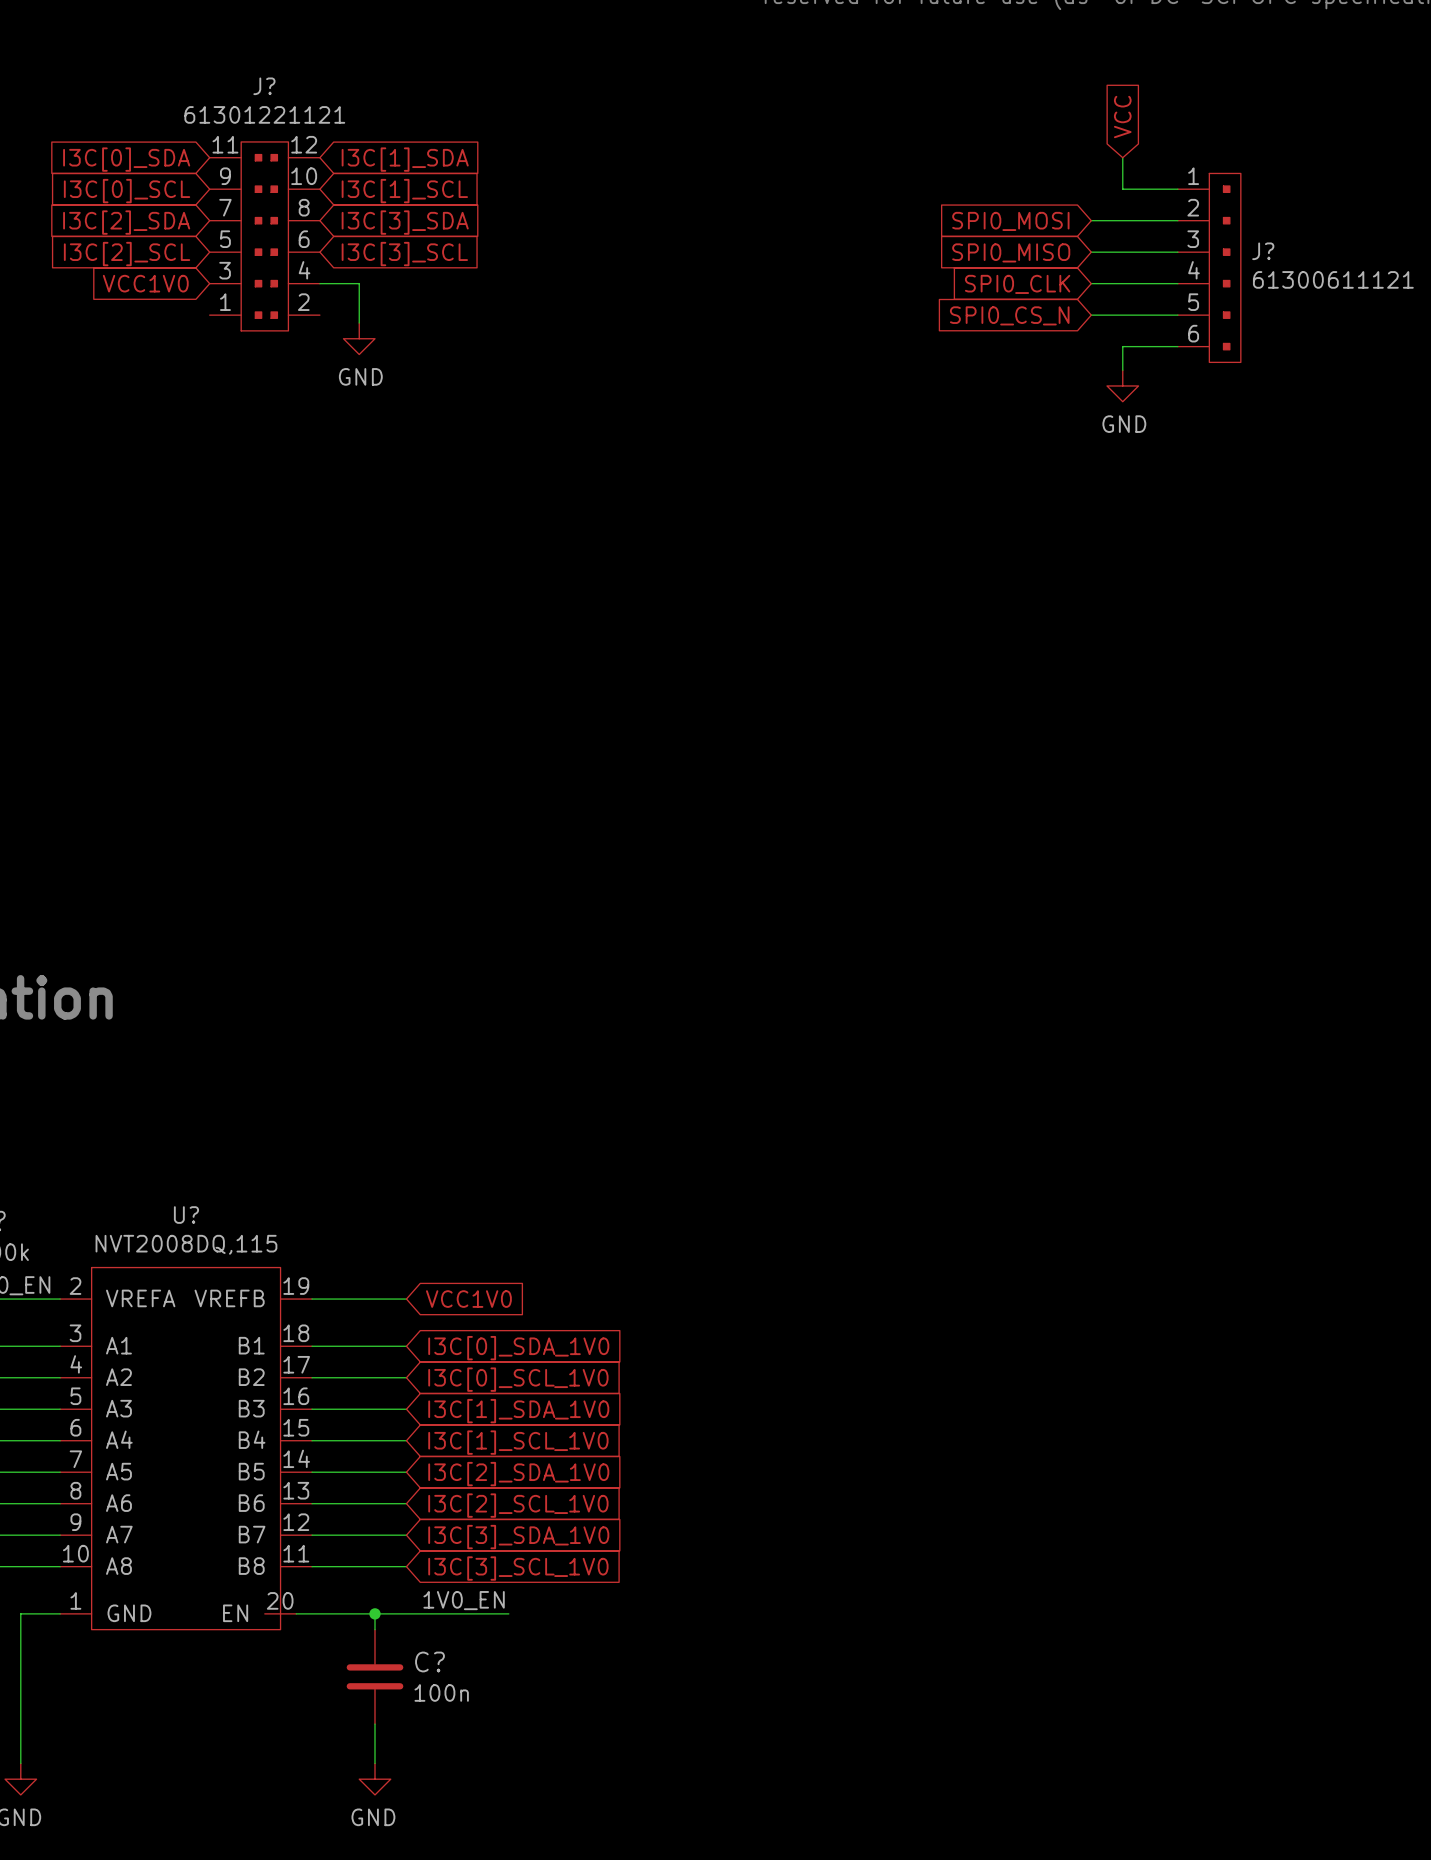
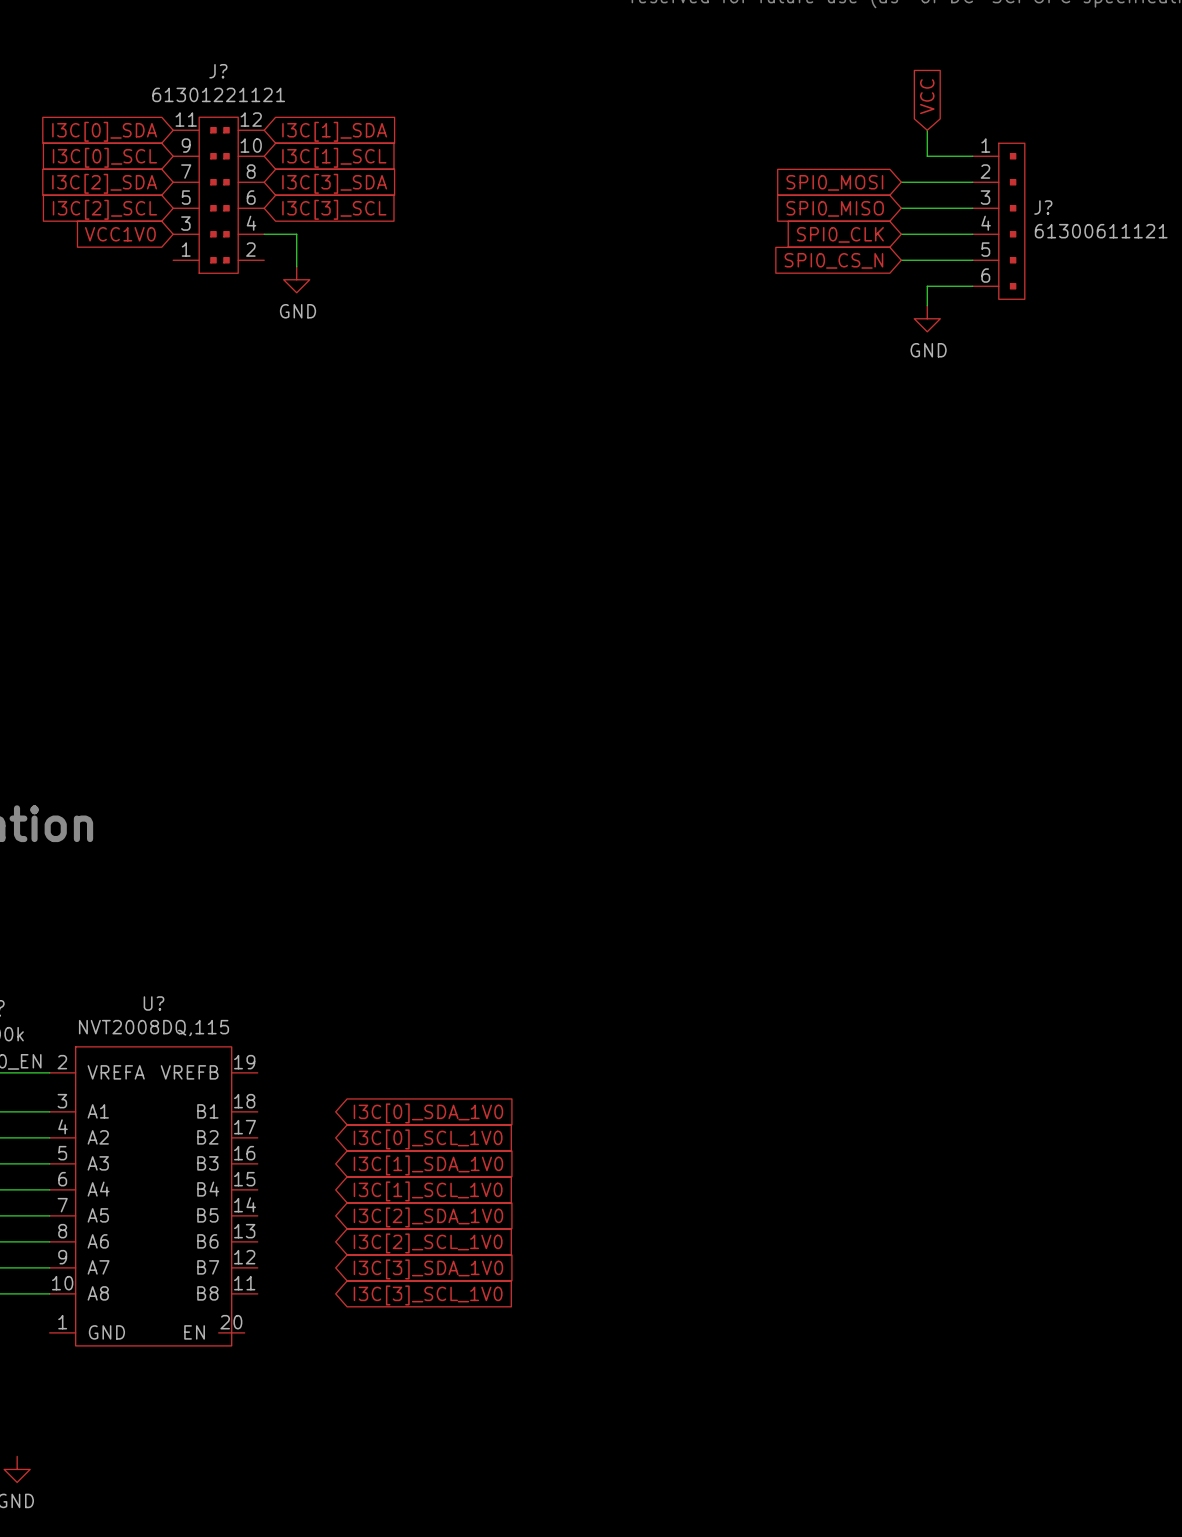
wire: (312, 1299) (406, 1299) -> none
global label: VCC1V0 (468, 1299) -> none
wire: (312, 1346) (406, 1346) -> none
wire: (312, 1377) (406, 1377) -> none
wire: (312, 1409) (406, 1409) -> none
wire: (312, 1440) (406, 1440) -> none
wire: (312, 1472) (406, 1472) -> none
wire: (312, 1503) (406, 1503) -> none
wire: (312, 1535) (406, 1535) -> none
wire: (312, 1566) (406, 1566) -> none
label: 1V0_EN (464, 1600) -> none
wire: (60, 1613) (20, 1613) (20, 1763) -> none
wire: (296, 1613) (508, 1613) -> none
wire: (375, 1613) (375, 1629) -> none
junction: (375, 1613) -> none
C?: (375, 1676) -> none
wire: (375, 1724) (375, 1763) -> none
power symbol: GND (375, 1779) -> none

